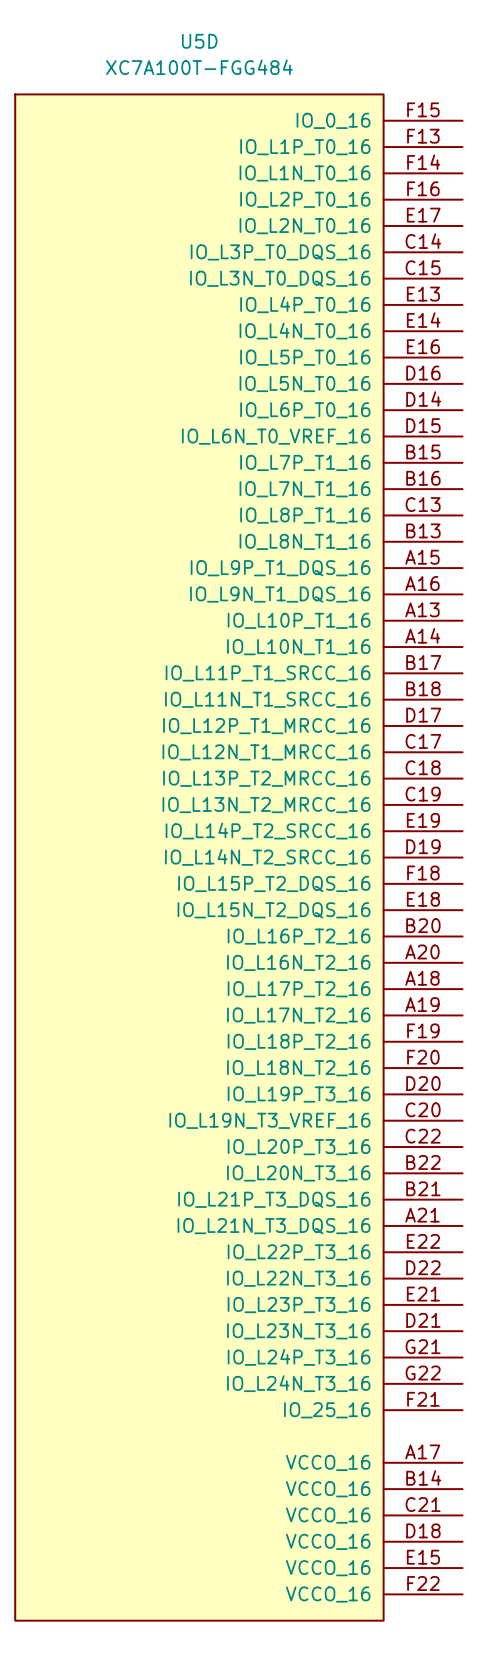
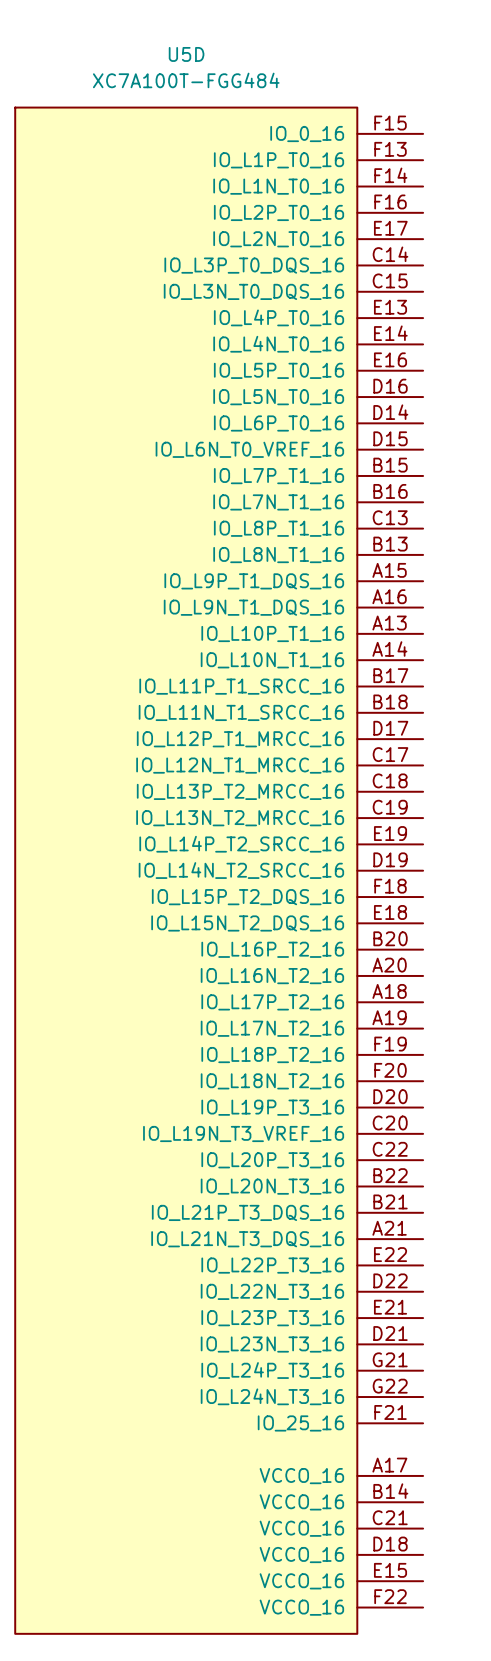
U5D symbol: [15, 94, 463, 1621] -> [15, 107, 424, 1634]

